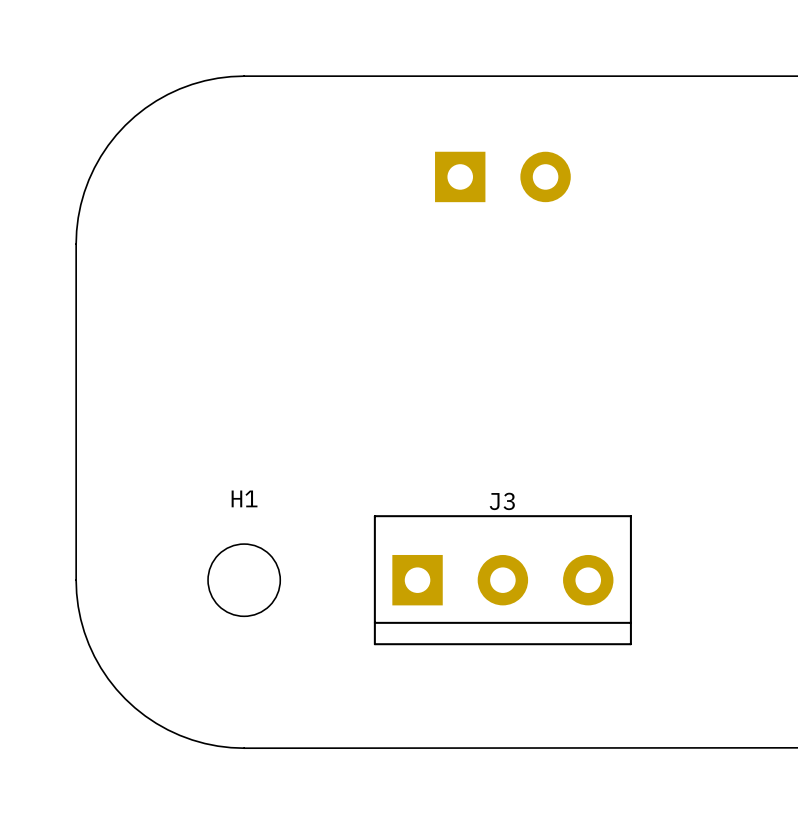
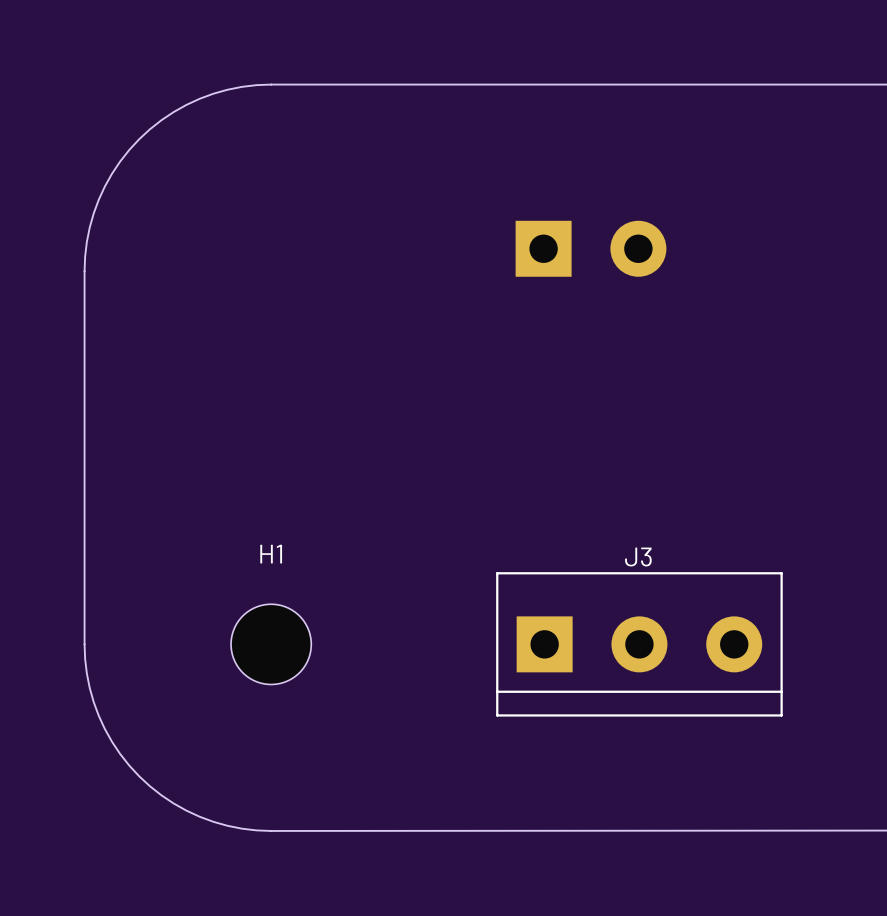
part position: (502, 176) -> (591, 248)
J3 position: (502, 580) -> (639, 644)

